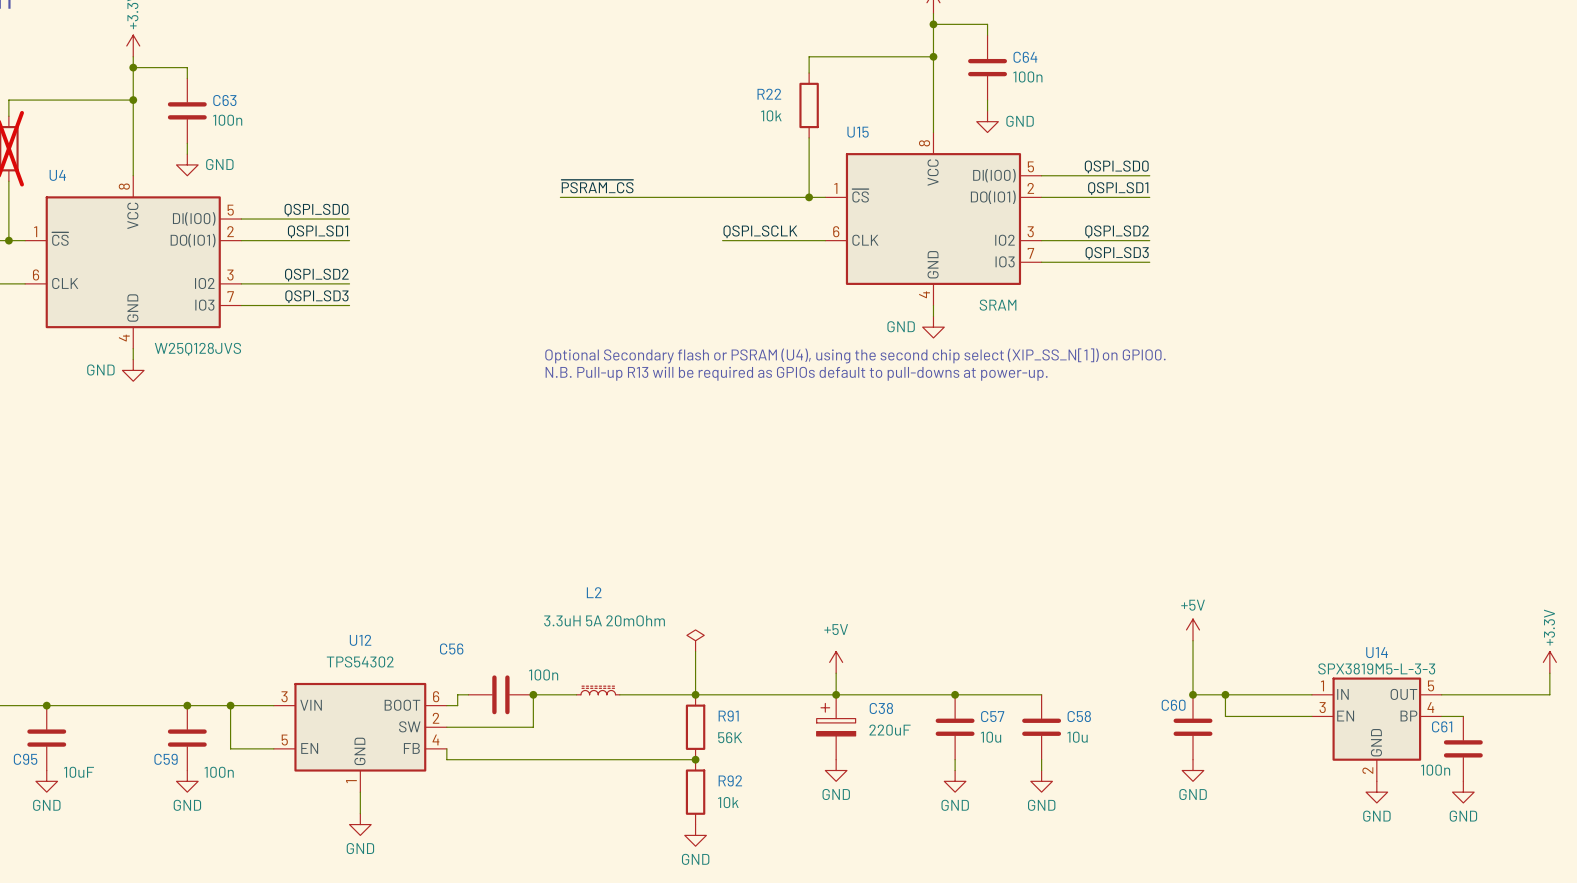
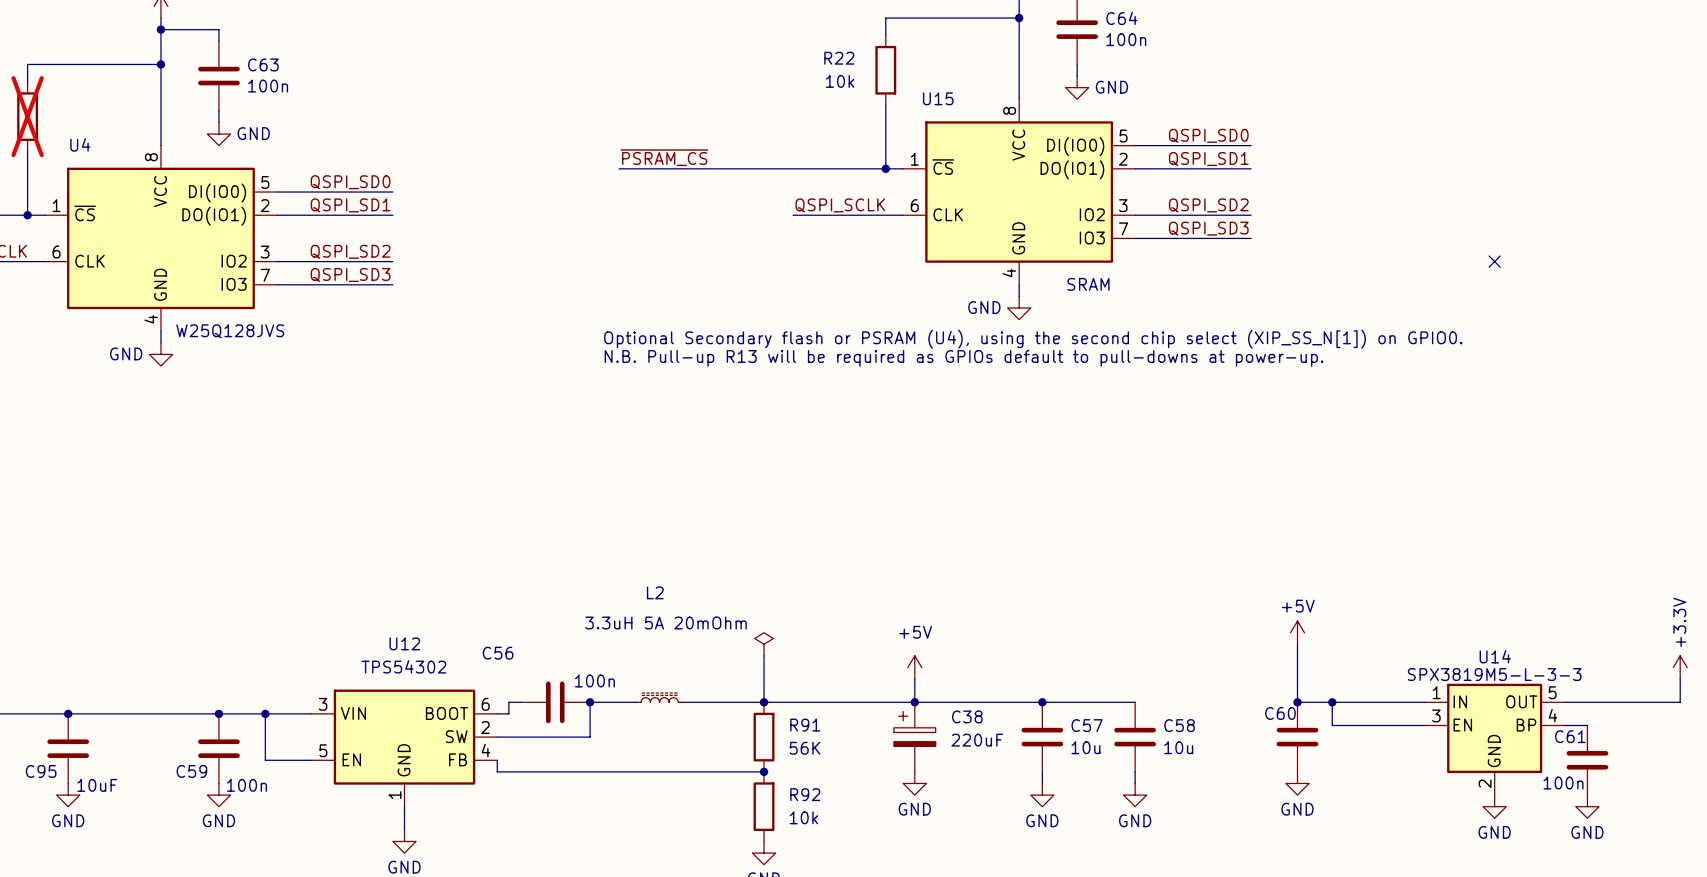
no-connect mark: none -> (1494, 261)

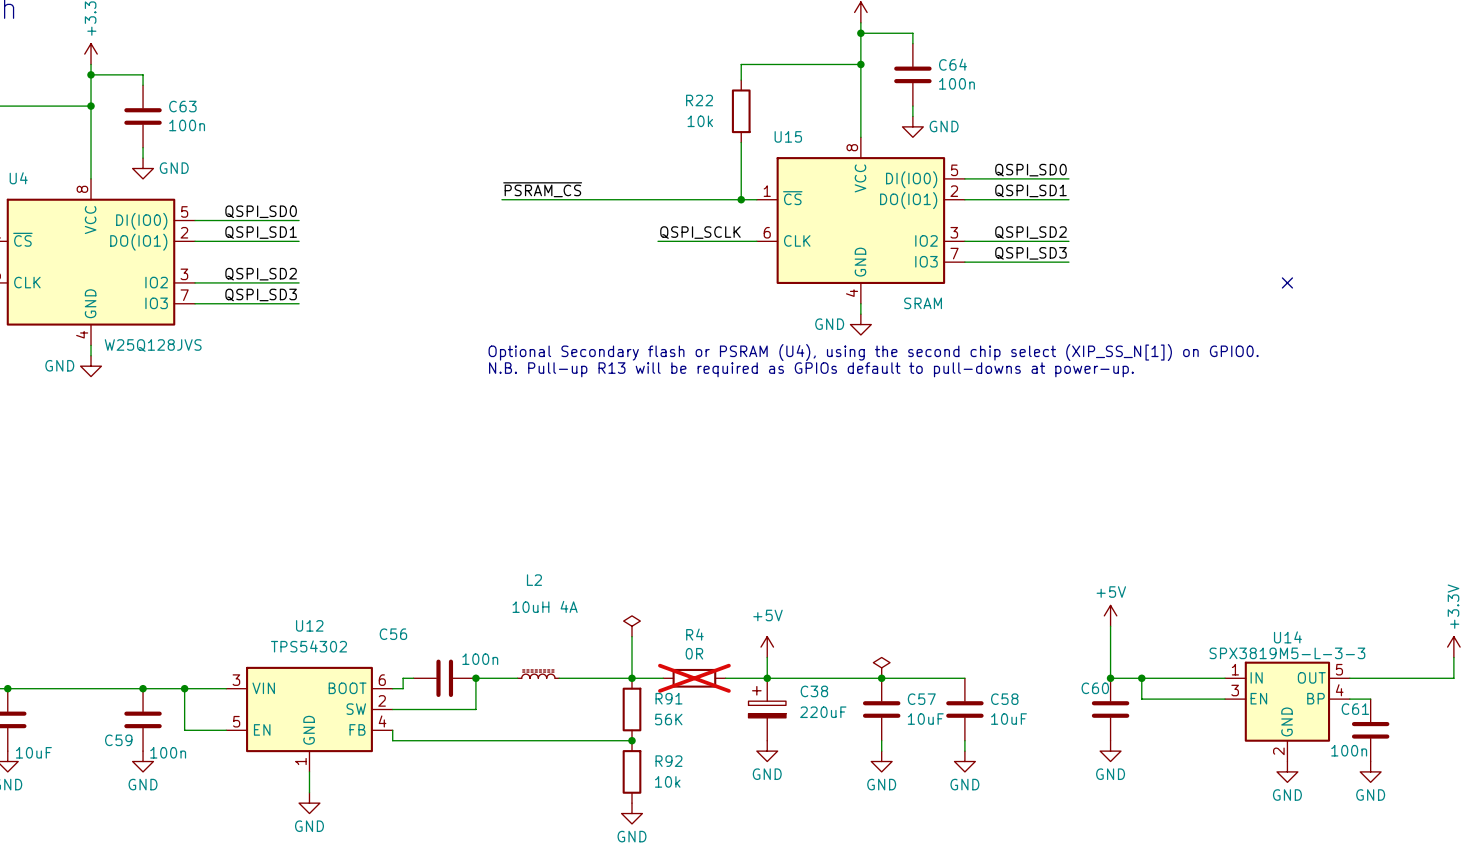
L2 value: 3.3uH 5A 20mOhm (666, 623) -> 10uH 4A (545, 606)
power symbol: none -> (881, 667)
R4: none -> 0R (694, 678)
C57 value: 10u (1085, 747) -> 10uF (925, 719)
C58 value: 10u (1178, 747) -> 10uF (1008, 719)

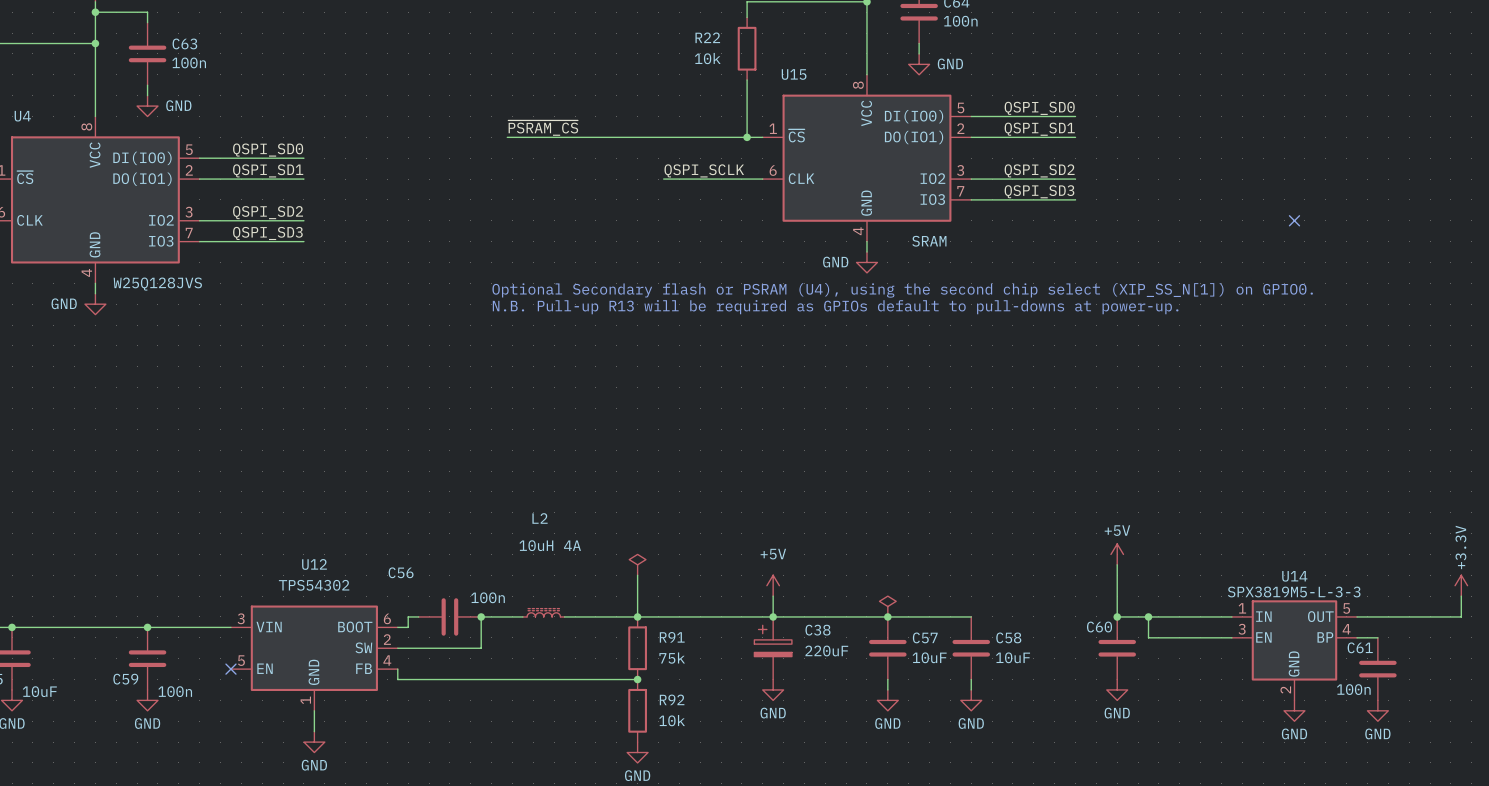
R4: 0R (694, 678) -> none
wire: (184, 688) (184, 730) (226, 730) -> none
junction: (184, 688) -> none
R91 value: 56K (668, 719) -> 75k (672, 658)
no-connect mark: none -> (230, 669)

